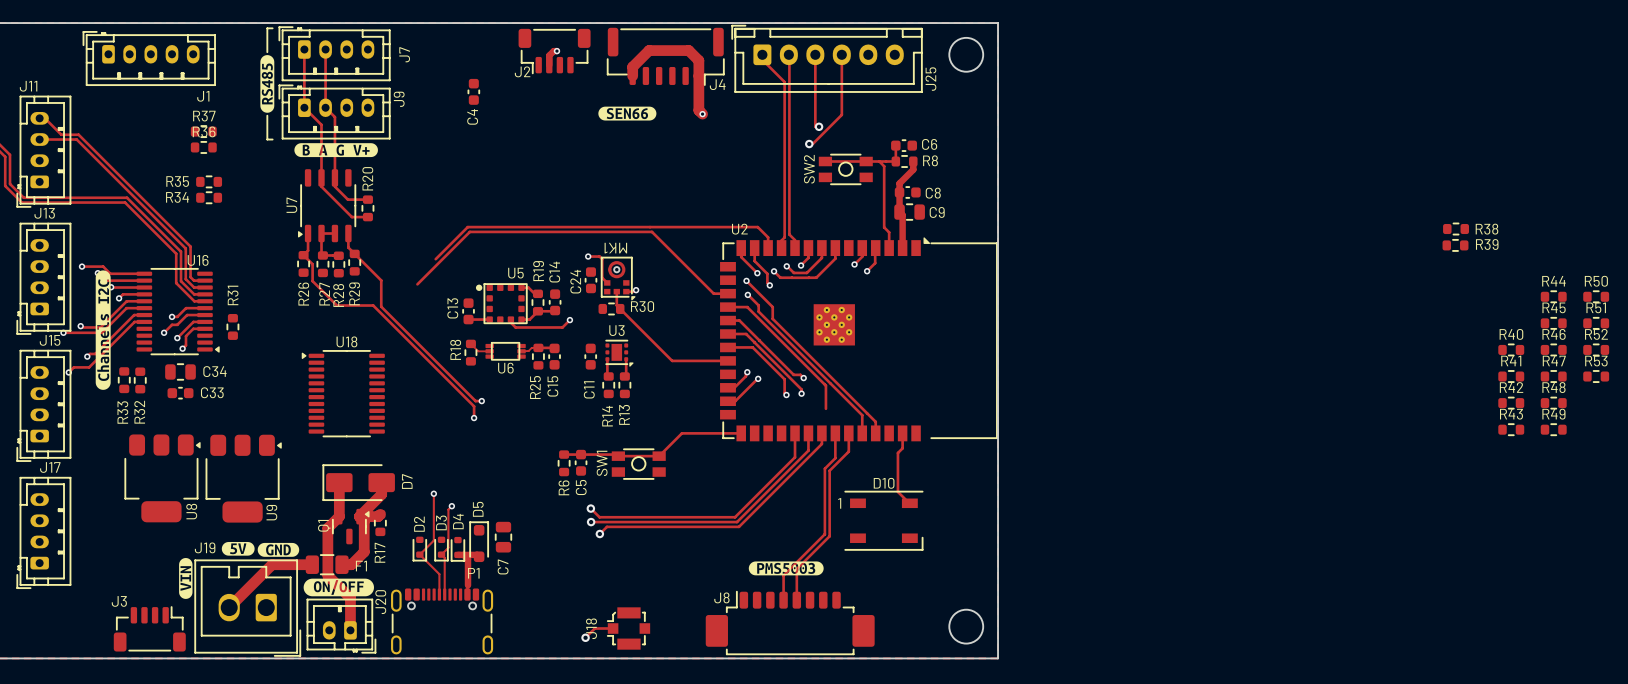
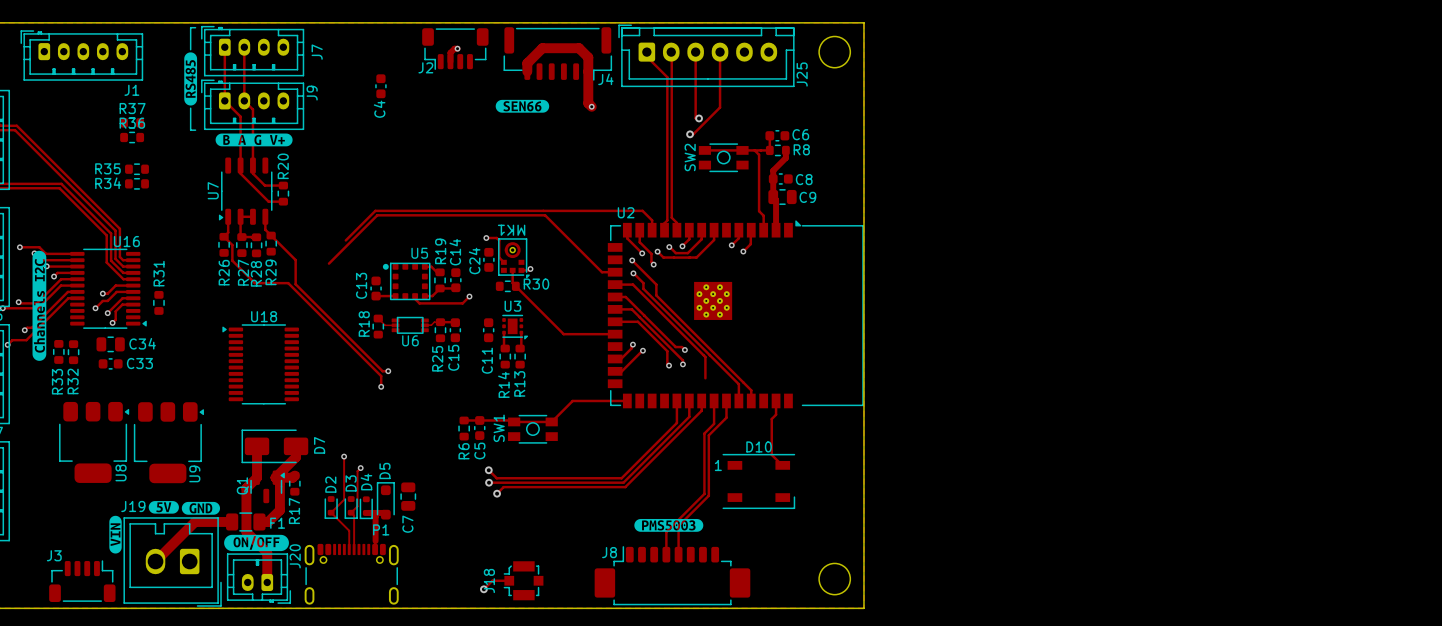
R38: (1456, 229) -> none
R39: (1455, 245) -> none
R44: (1553, 296) -> none
R50: (1596, 296) -> none
R45: (1553, 323) -> none
R51: (1596, 323) -> none
R40: (1511, 349) -> none
R46: (1553, 349) -> none
R52: (1596, 349) -> none
R41: (1511, 376) -> none
R47: (1553, 376) -> none
R53: (1596, 376) -> none
R42: (1511, 403) -> none
R48: (1553, 403) -> none
R43: (1511, 429) -> none
R49: (1553, 429) -> none

